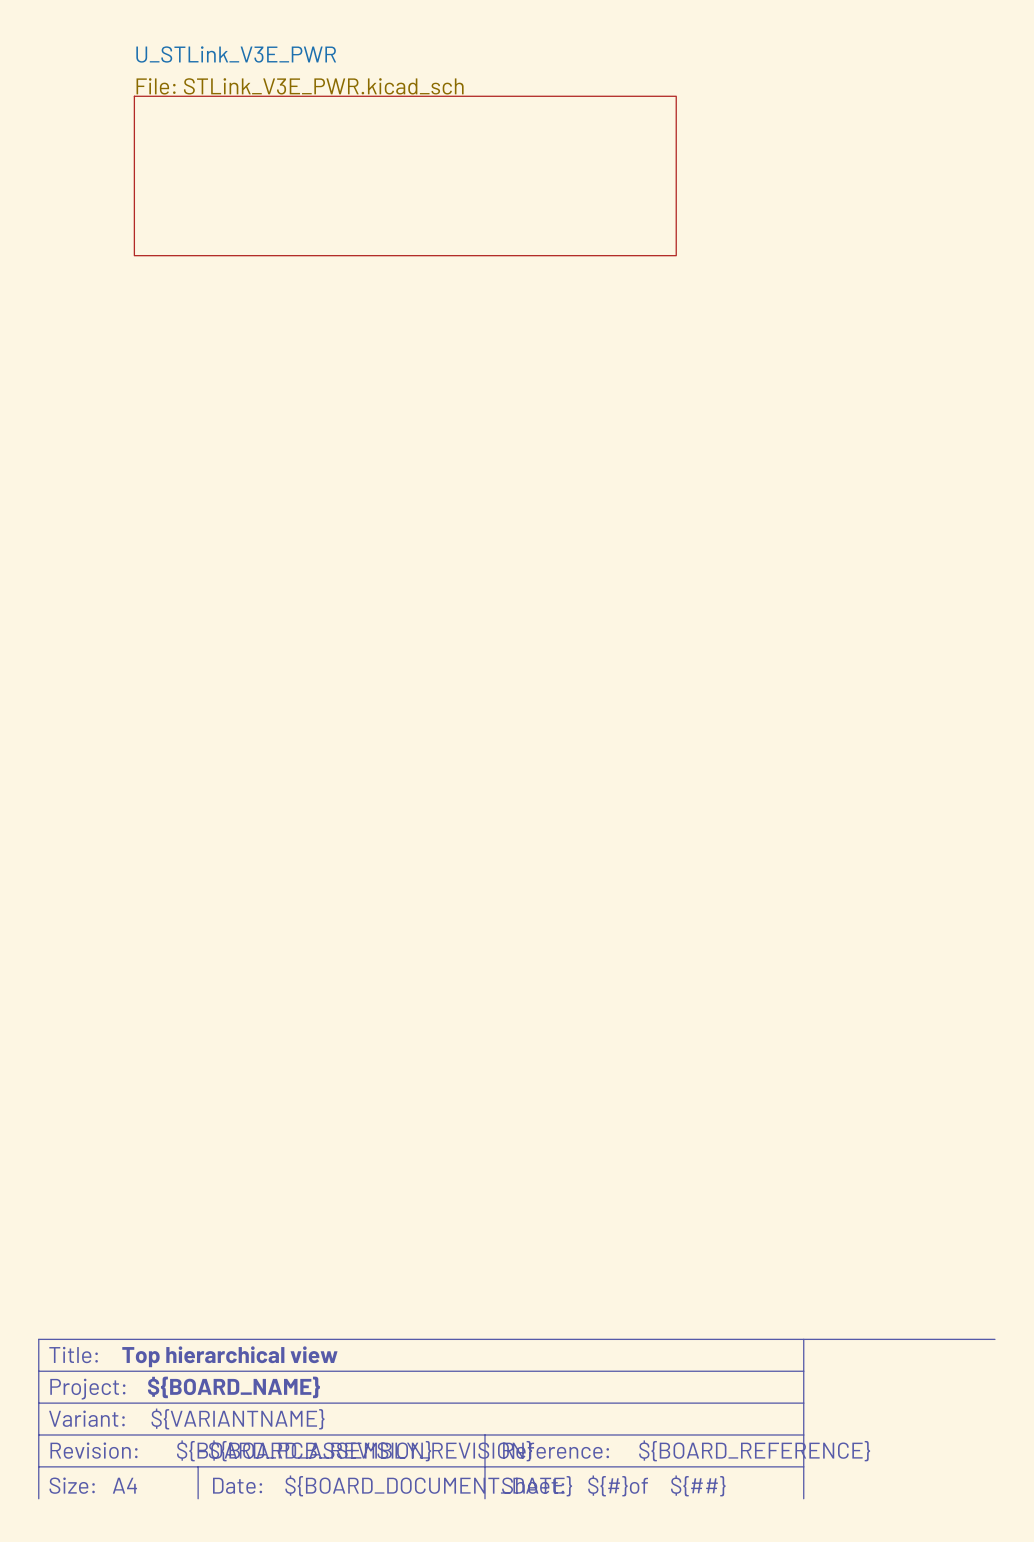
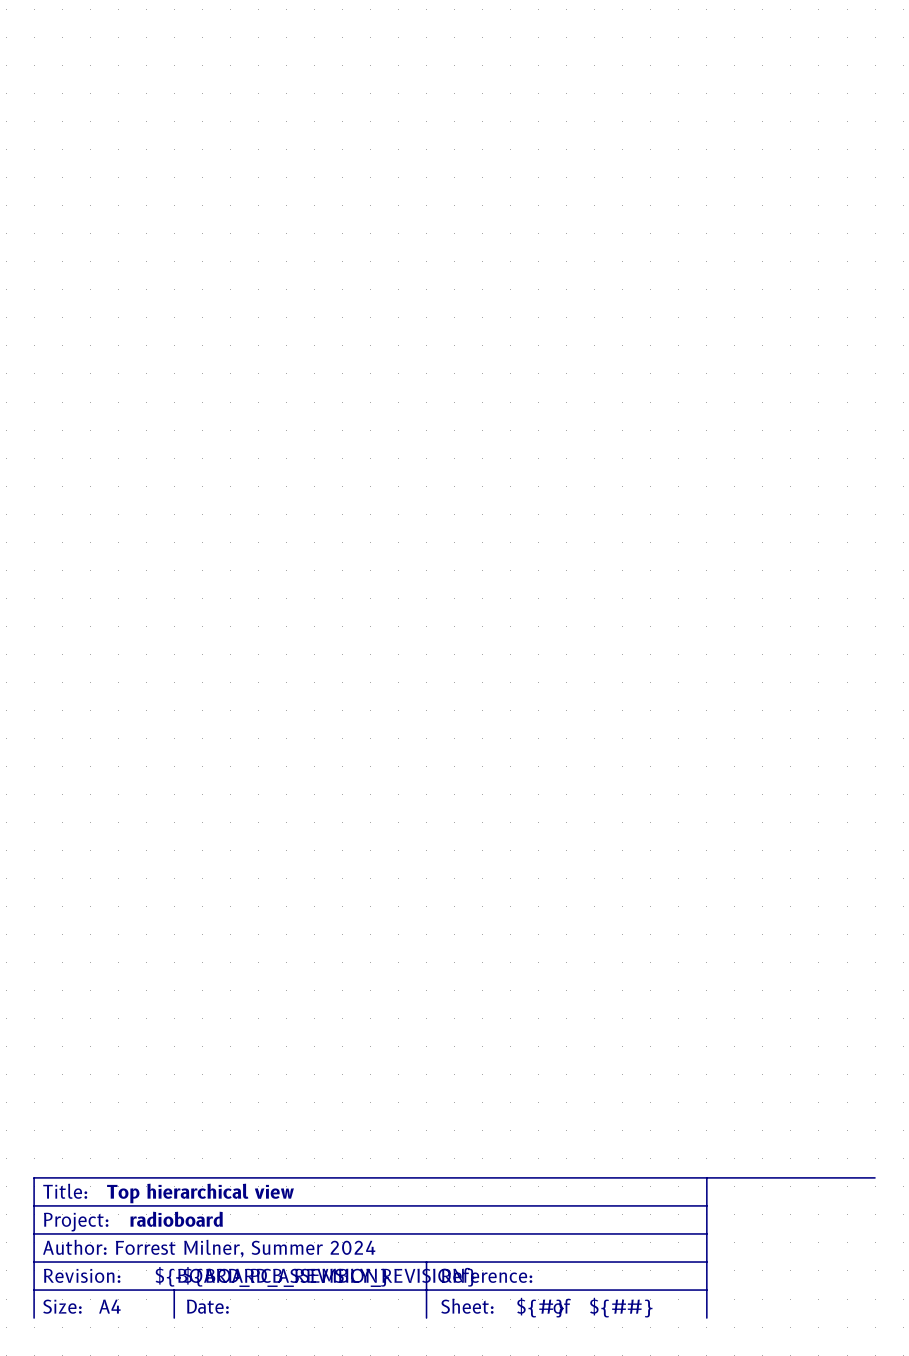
sheet U_STLink_V3E_PWR: File: STLink_V3E_PWR.kicad_sch (405, 175) -> none
text: ${BOARD_NAME} (233, 1387) -> radioboard (176, 1219)
text: Variant: (86, 1418) -> Author: Forrest Milner, Summer 2024 (209, 1248)
text: ${VARIANTNAME} (238, 1419) -> none
text: ${BOARD_REFERENCE} (754, 1450) -> none
text: ${BOARD_DOCUMENT_DATE} (428, 1485) -> none

